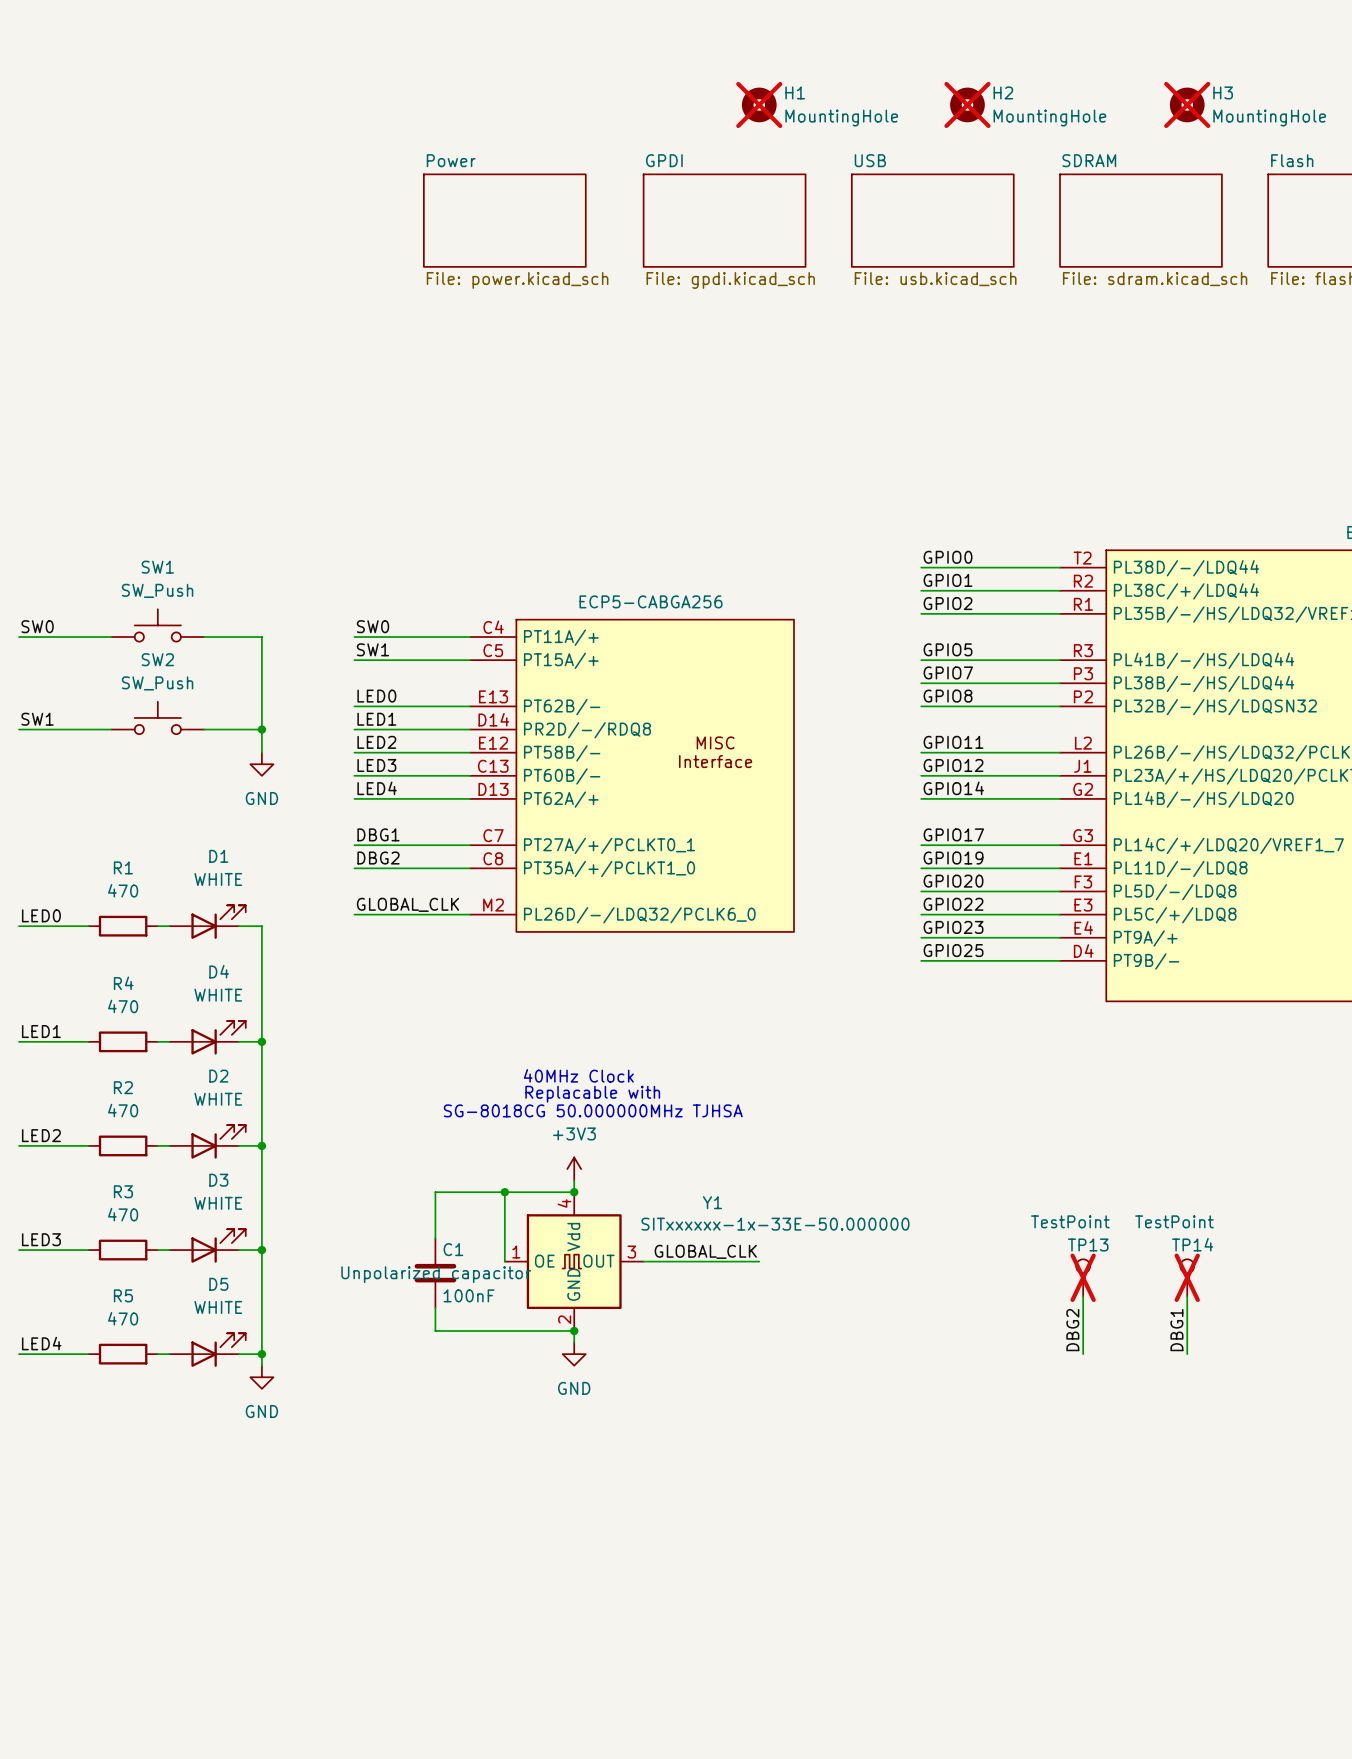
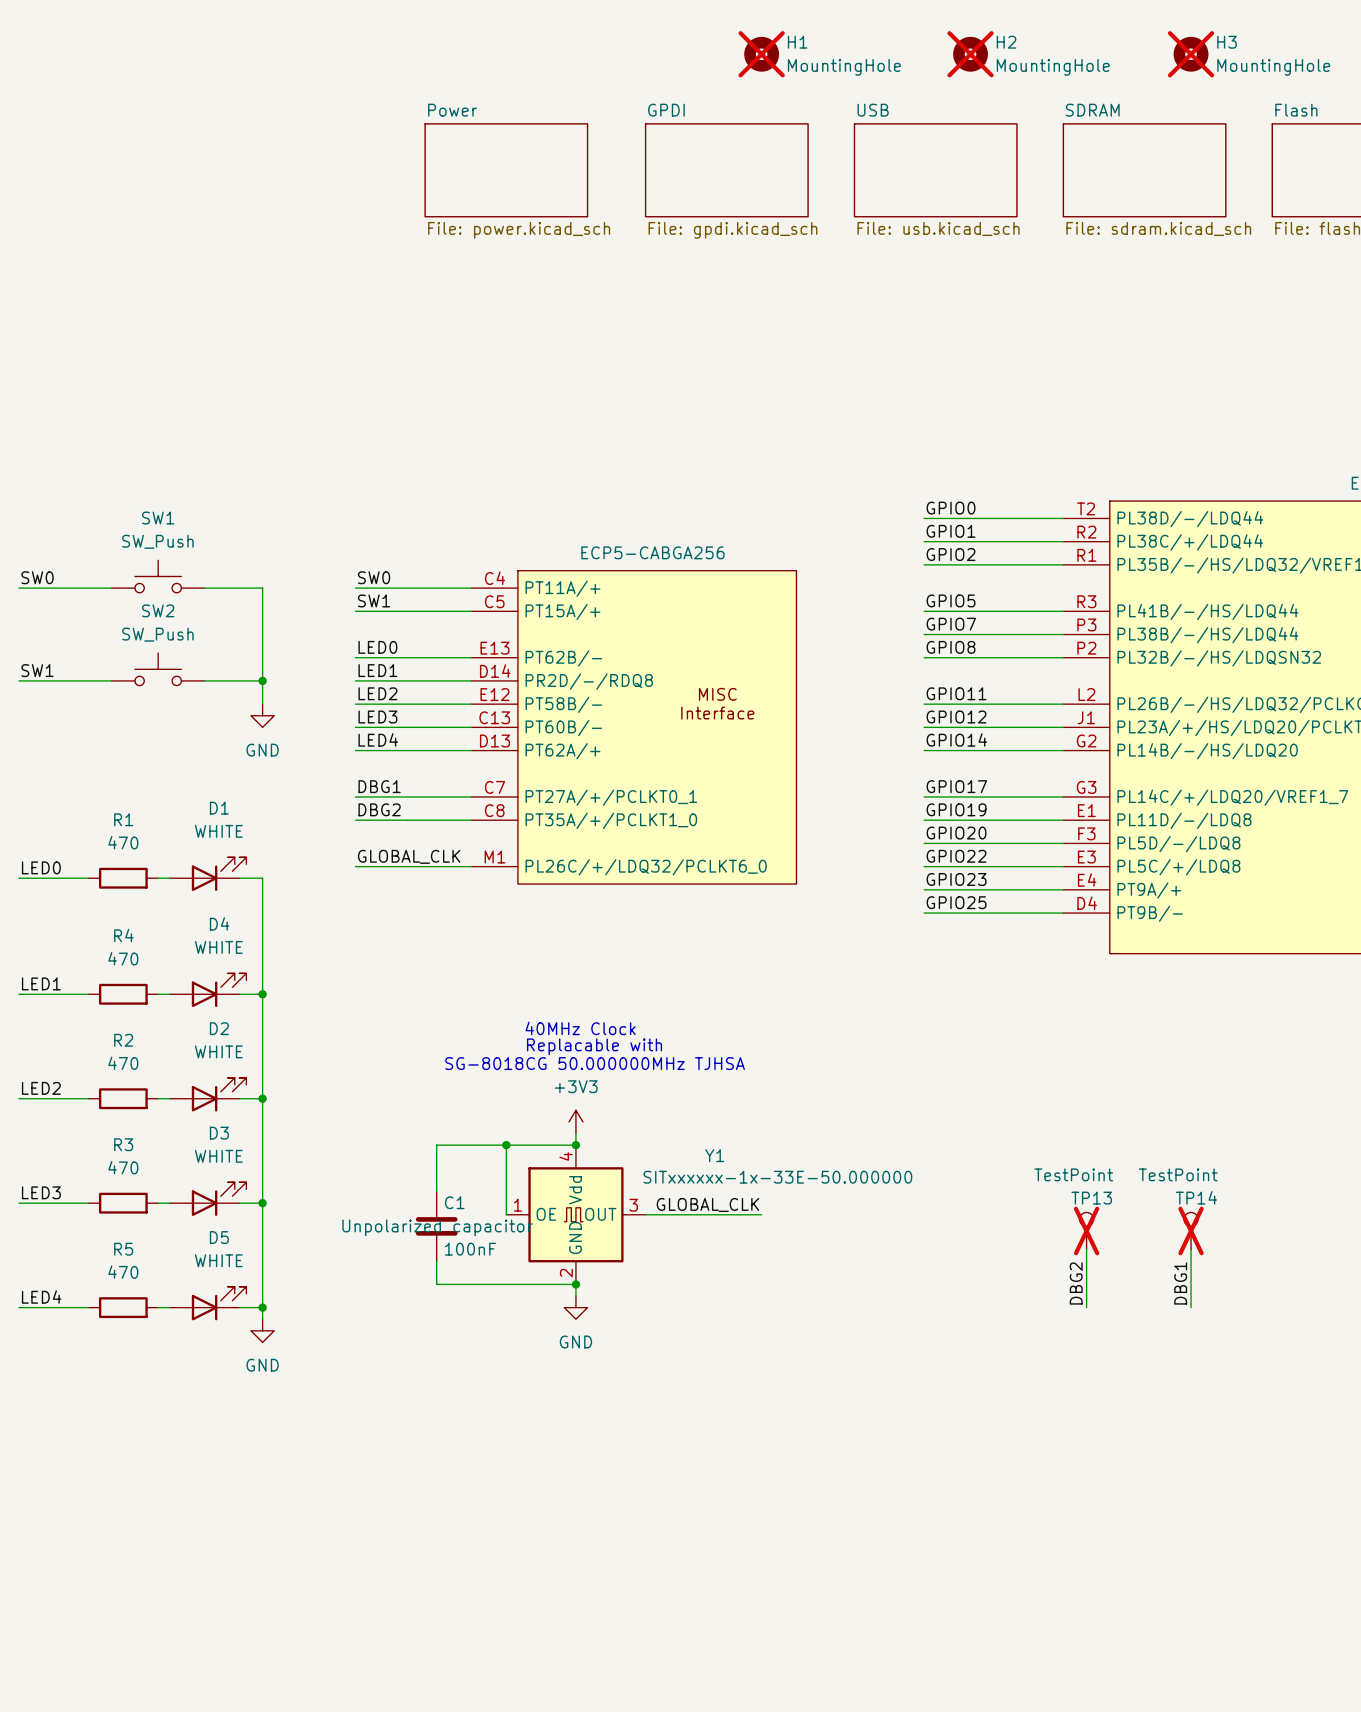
part pin number: M2 (493, 905) -> M1 (494, 857)
part pin name: PL26D/-/LDQ32/PCLK6_0 (639, 915) -> PL26C/+/LDQ32/PCLKT6_0 (646, 867)

